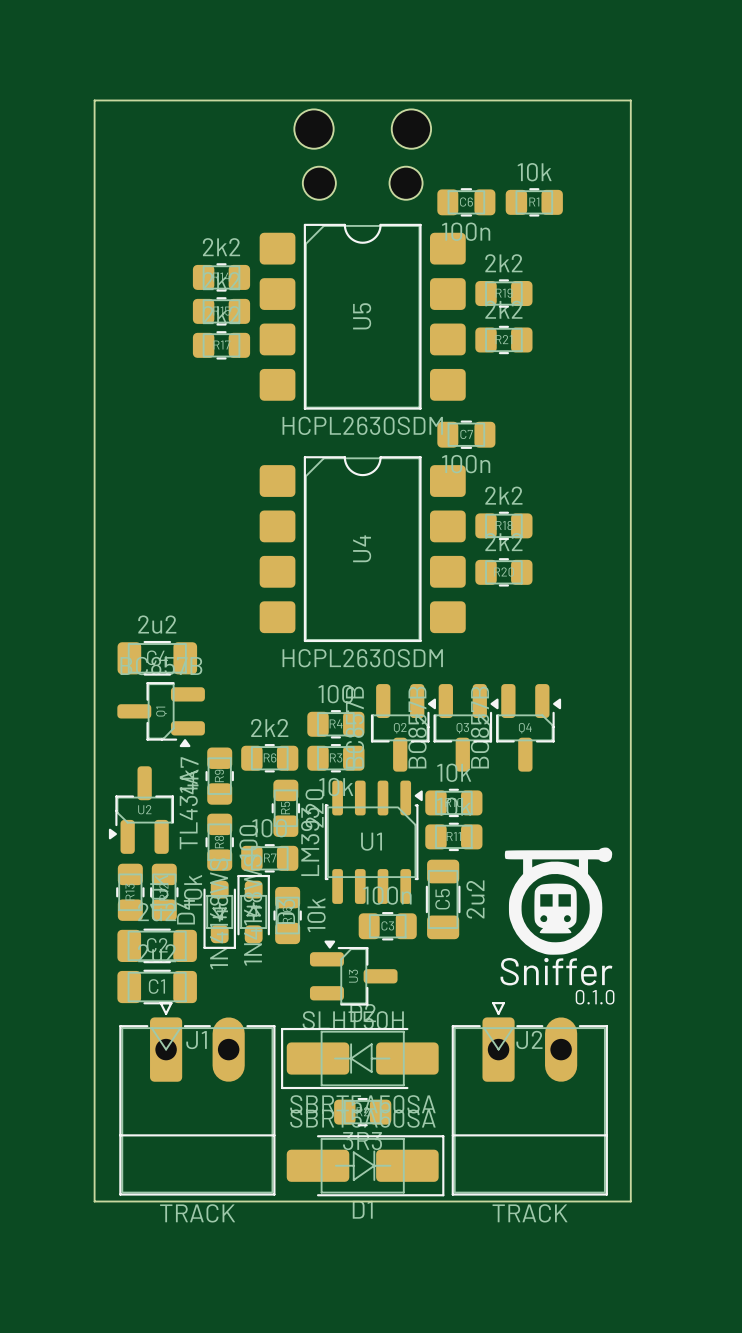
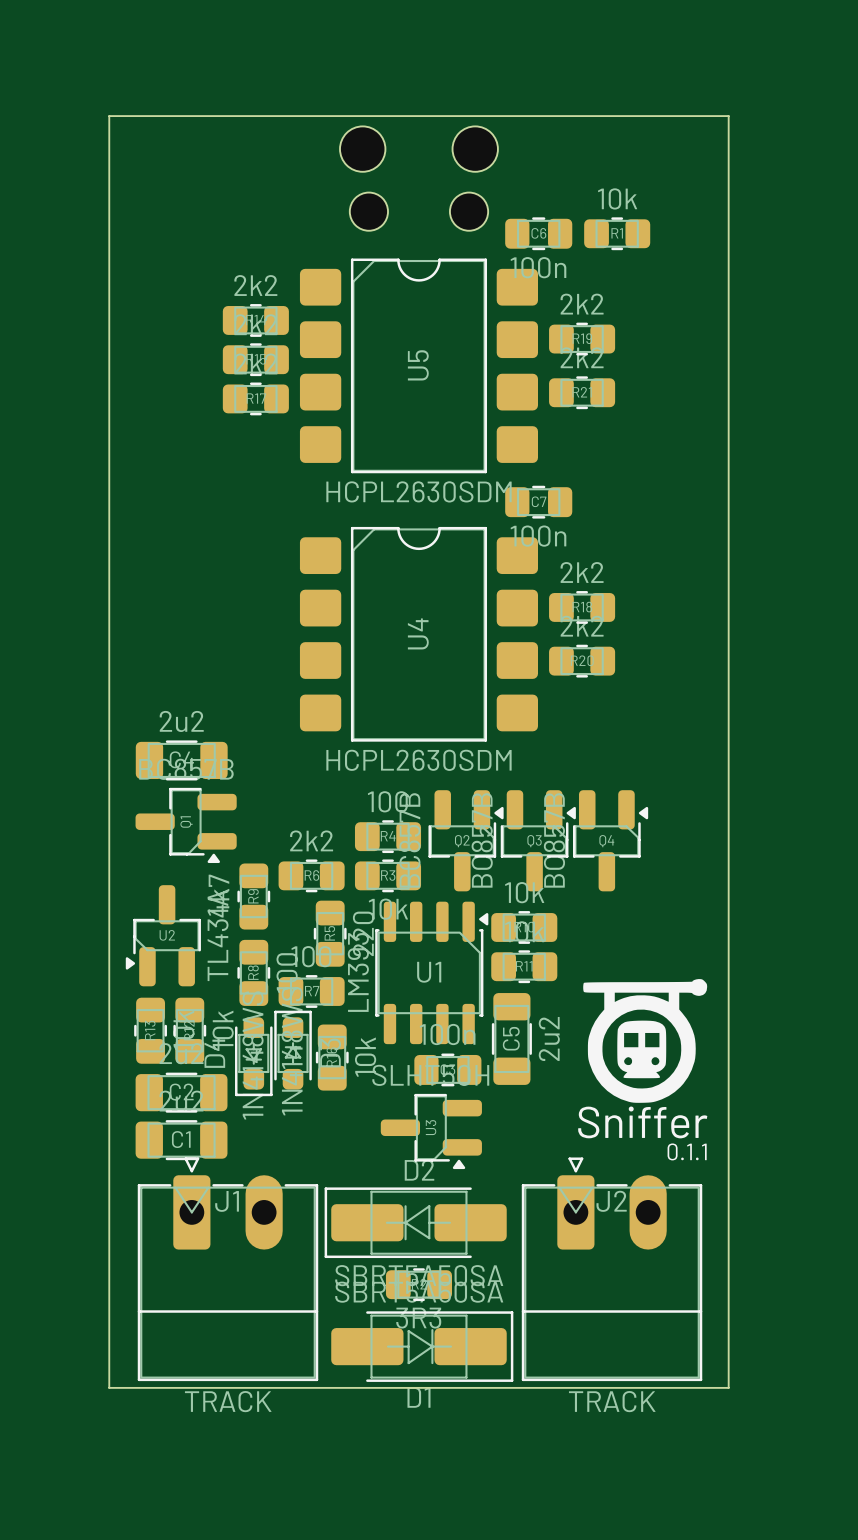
U3 rotation: 0° (353, 973) -> 180° (431, 1131)
text: 0.1.0 (595, 997) -> 0.1.1 (687, 1151)

